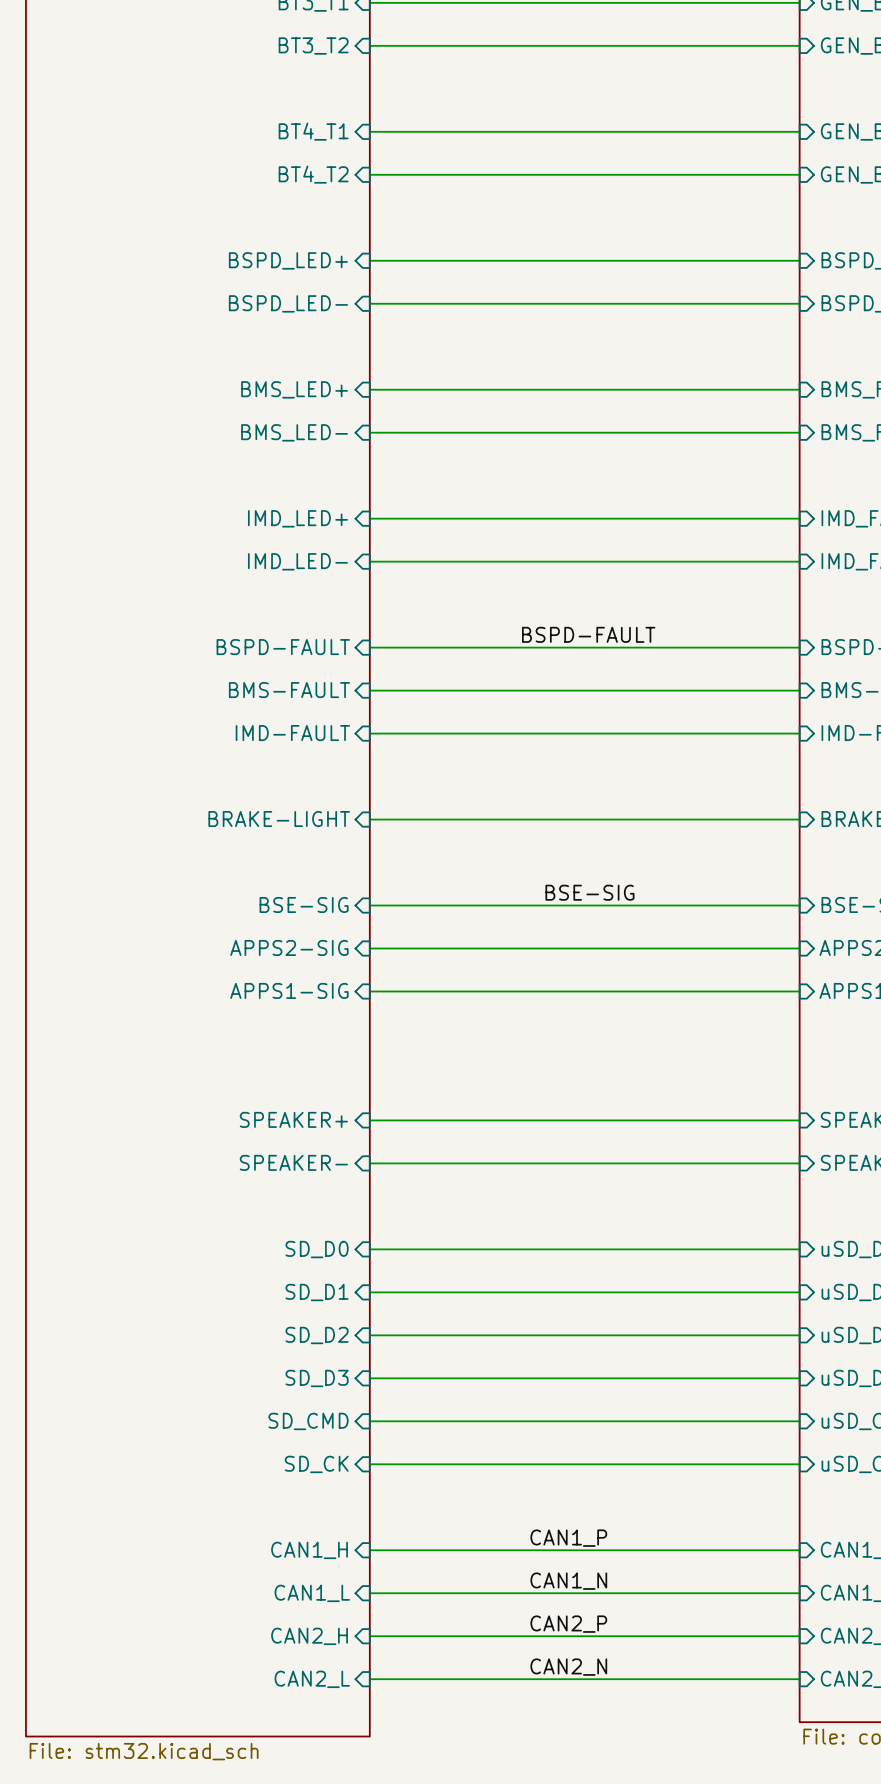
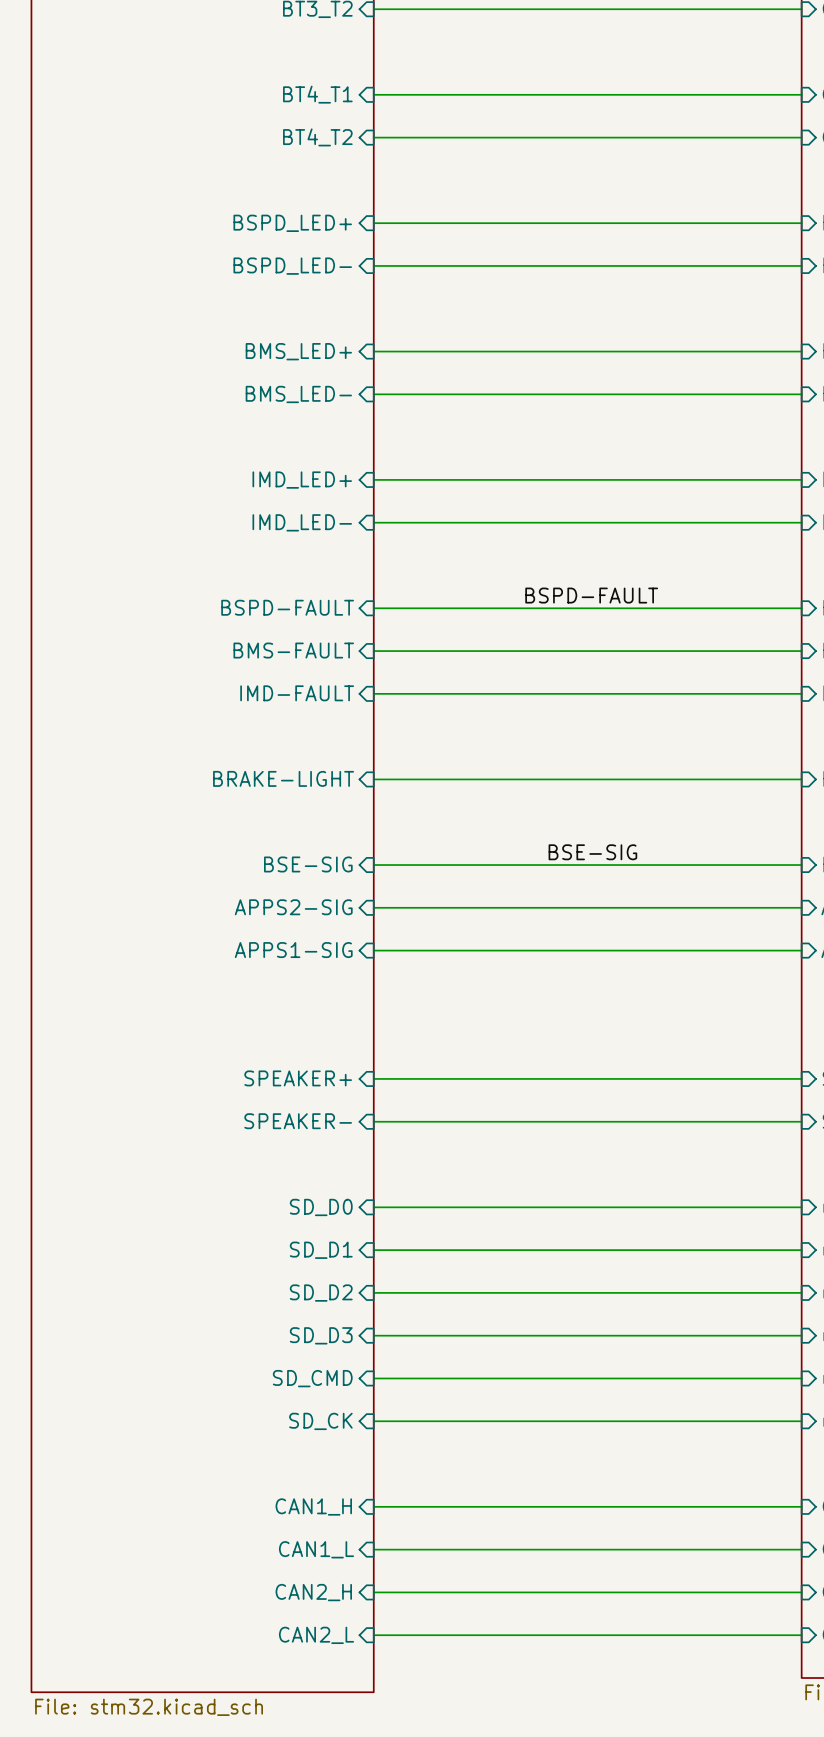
label: CAN1_P (568, 1538) -> none
label: CAN1_N (568, 1581) -> none
label: CAN2_P (568, 1624) -> none
label: CAN2_N (568, 1667) -> none

